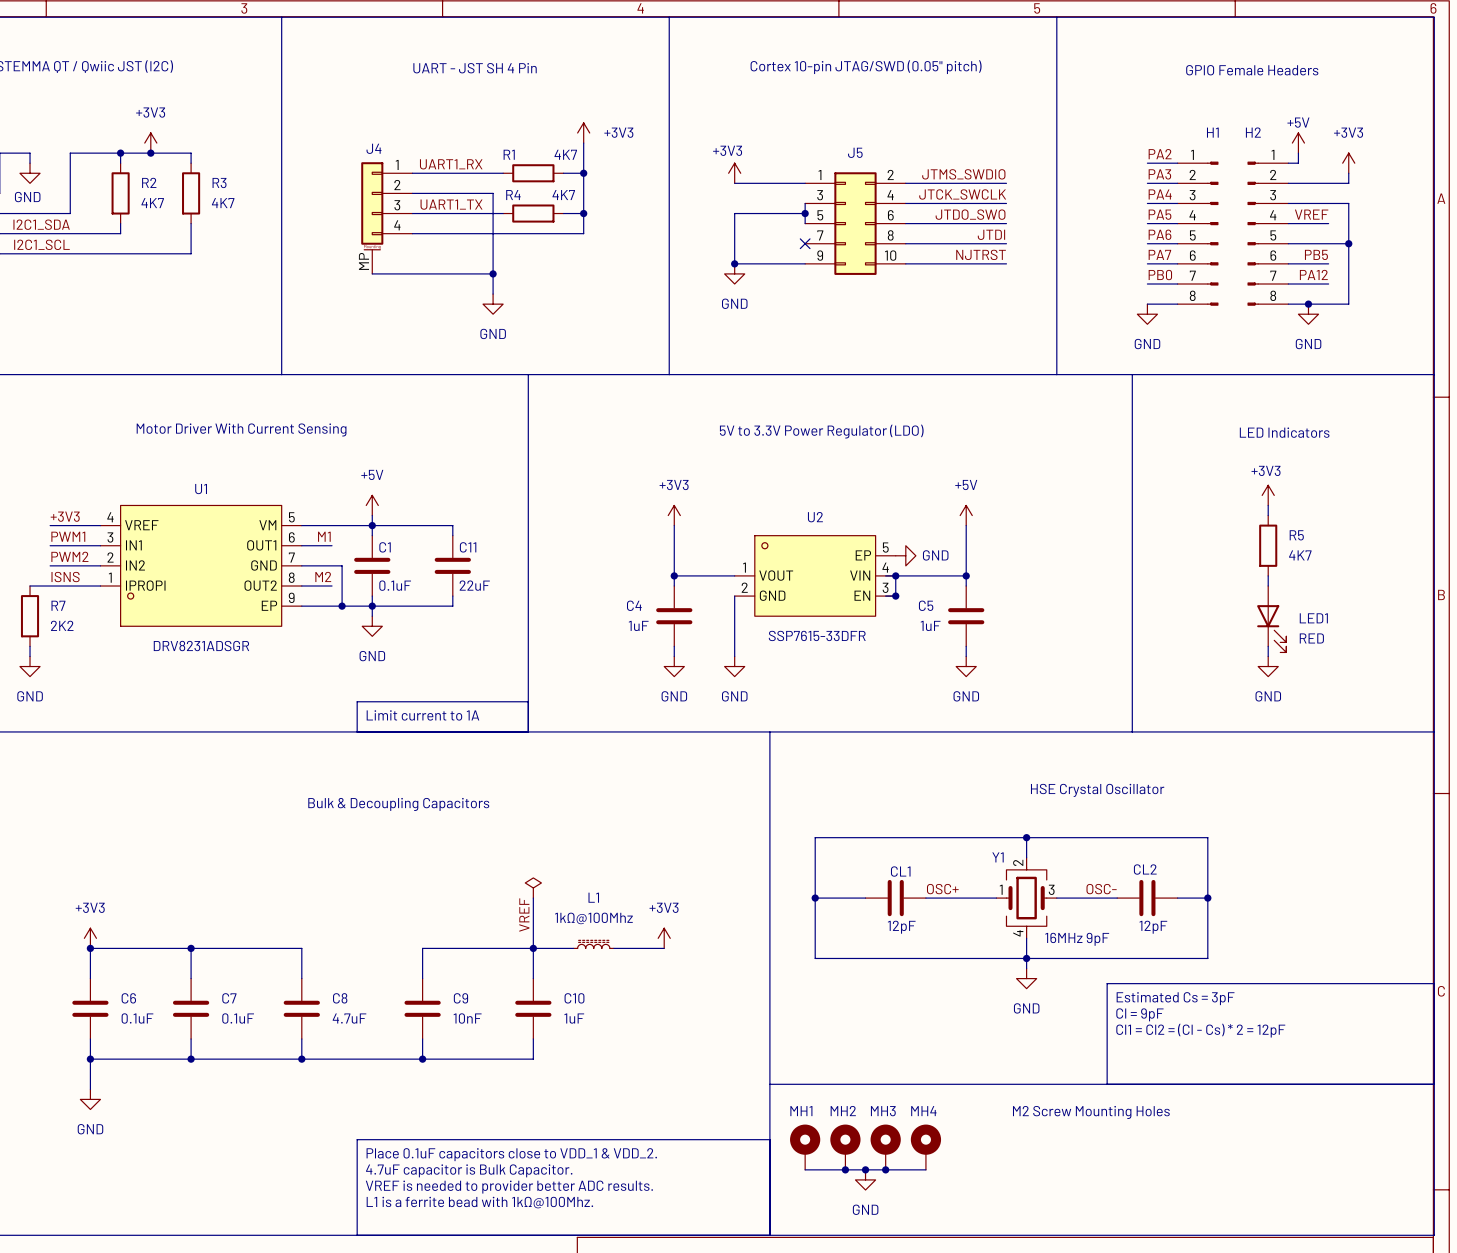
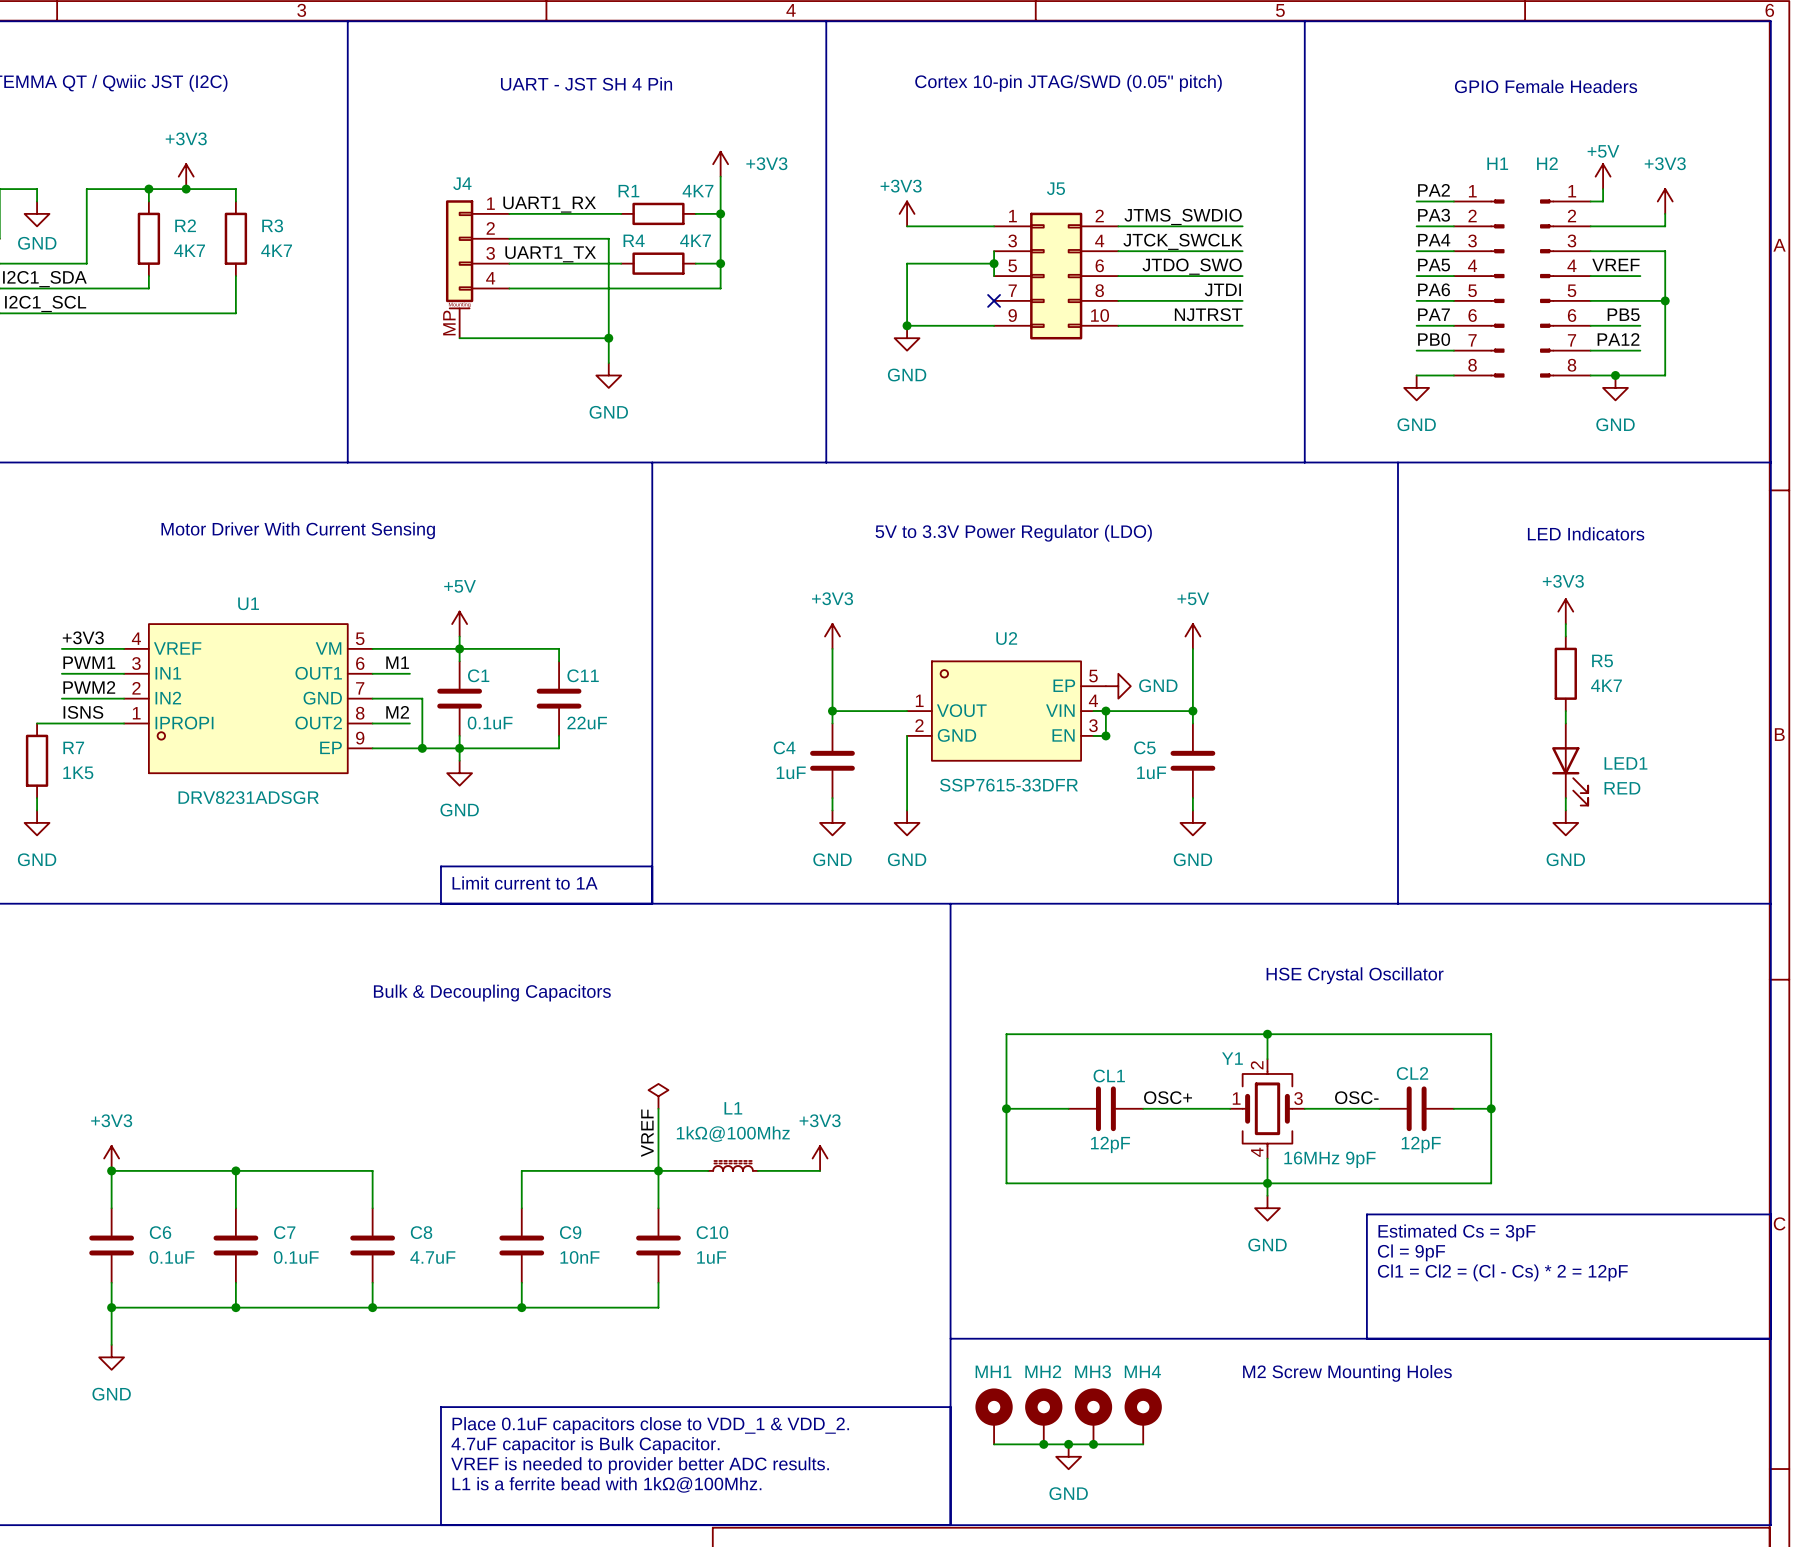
R7 value: 2K2 (62, 625) -> 1K5 (78, 772)

